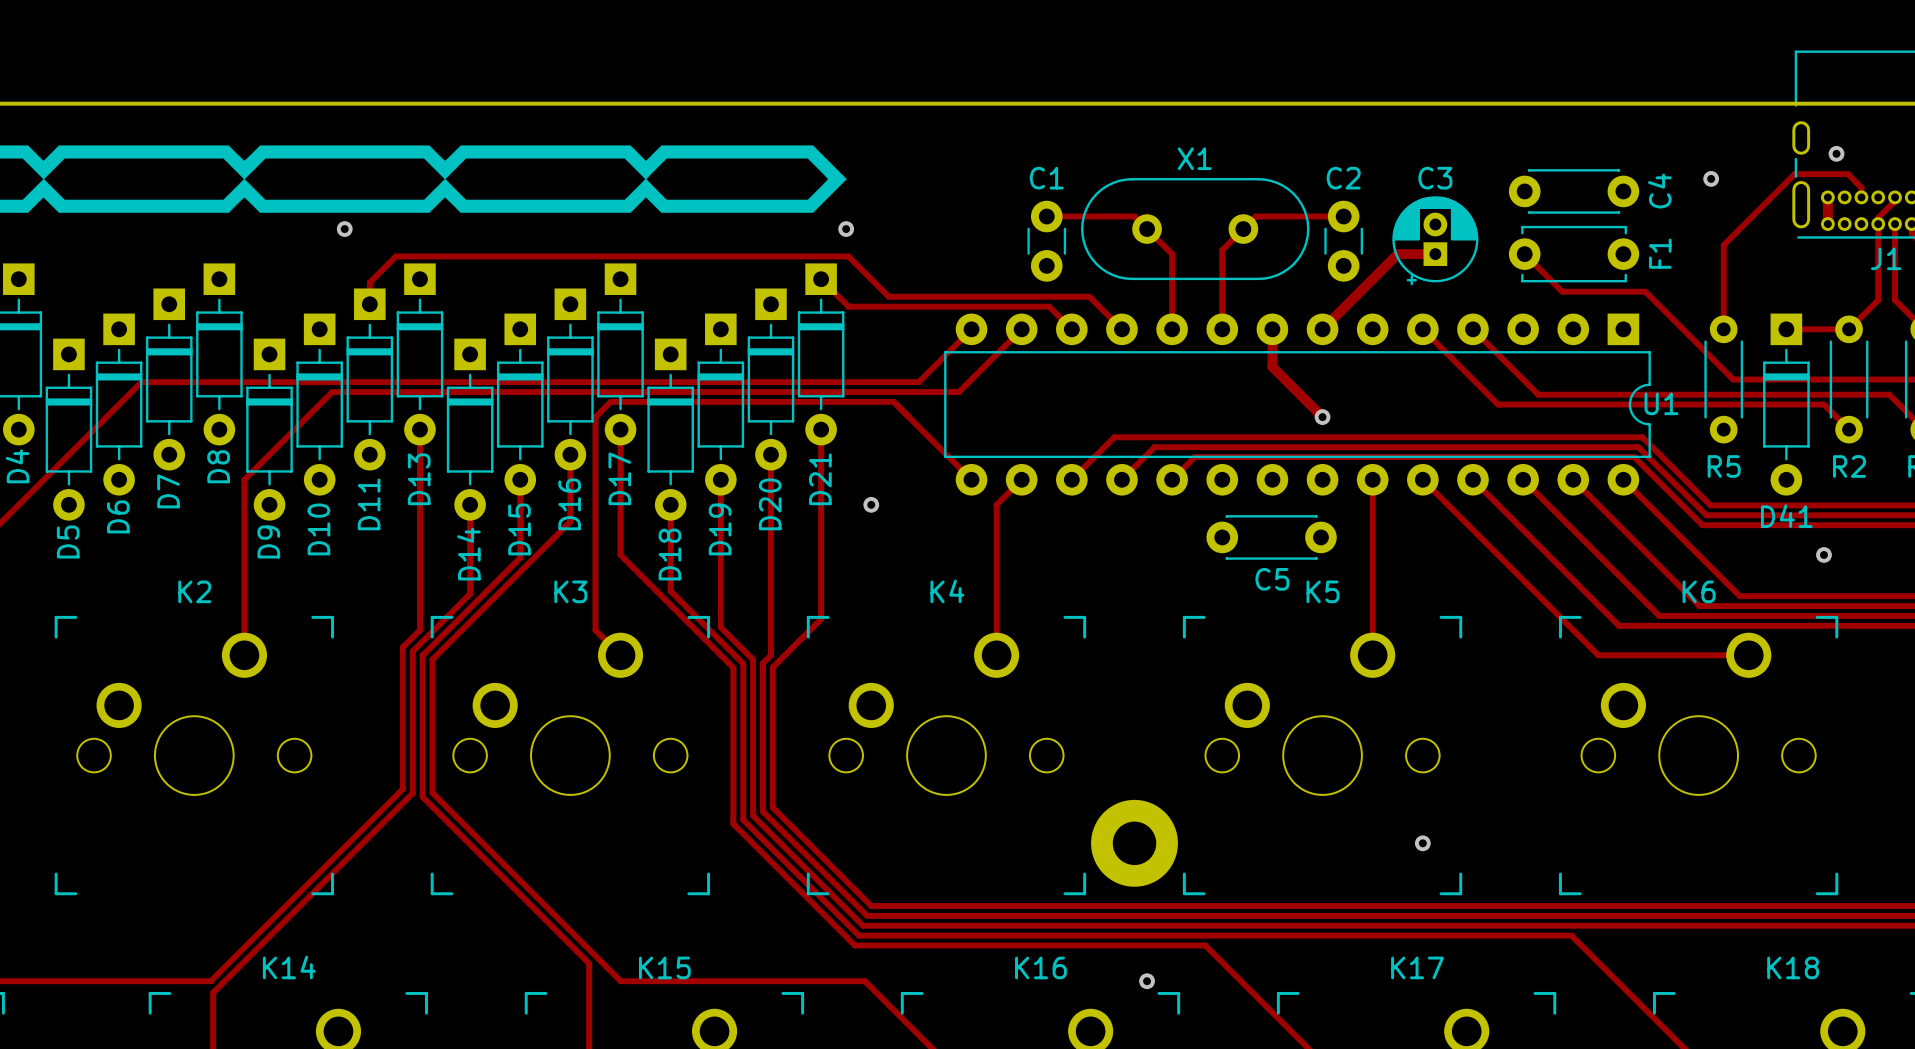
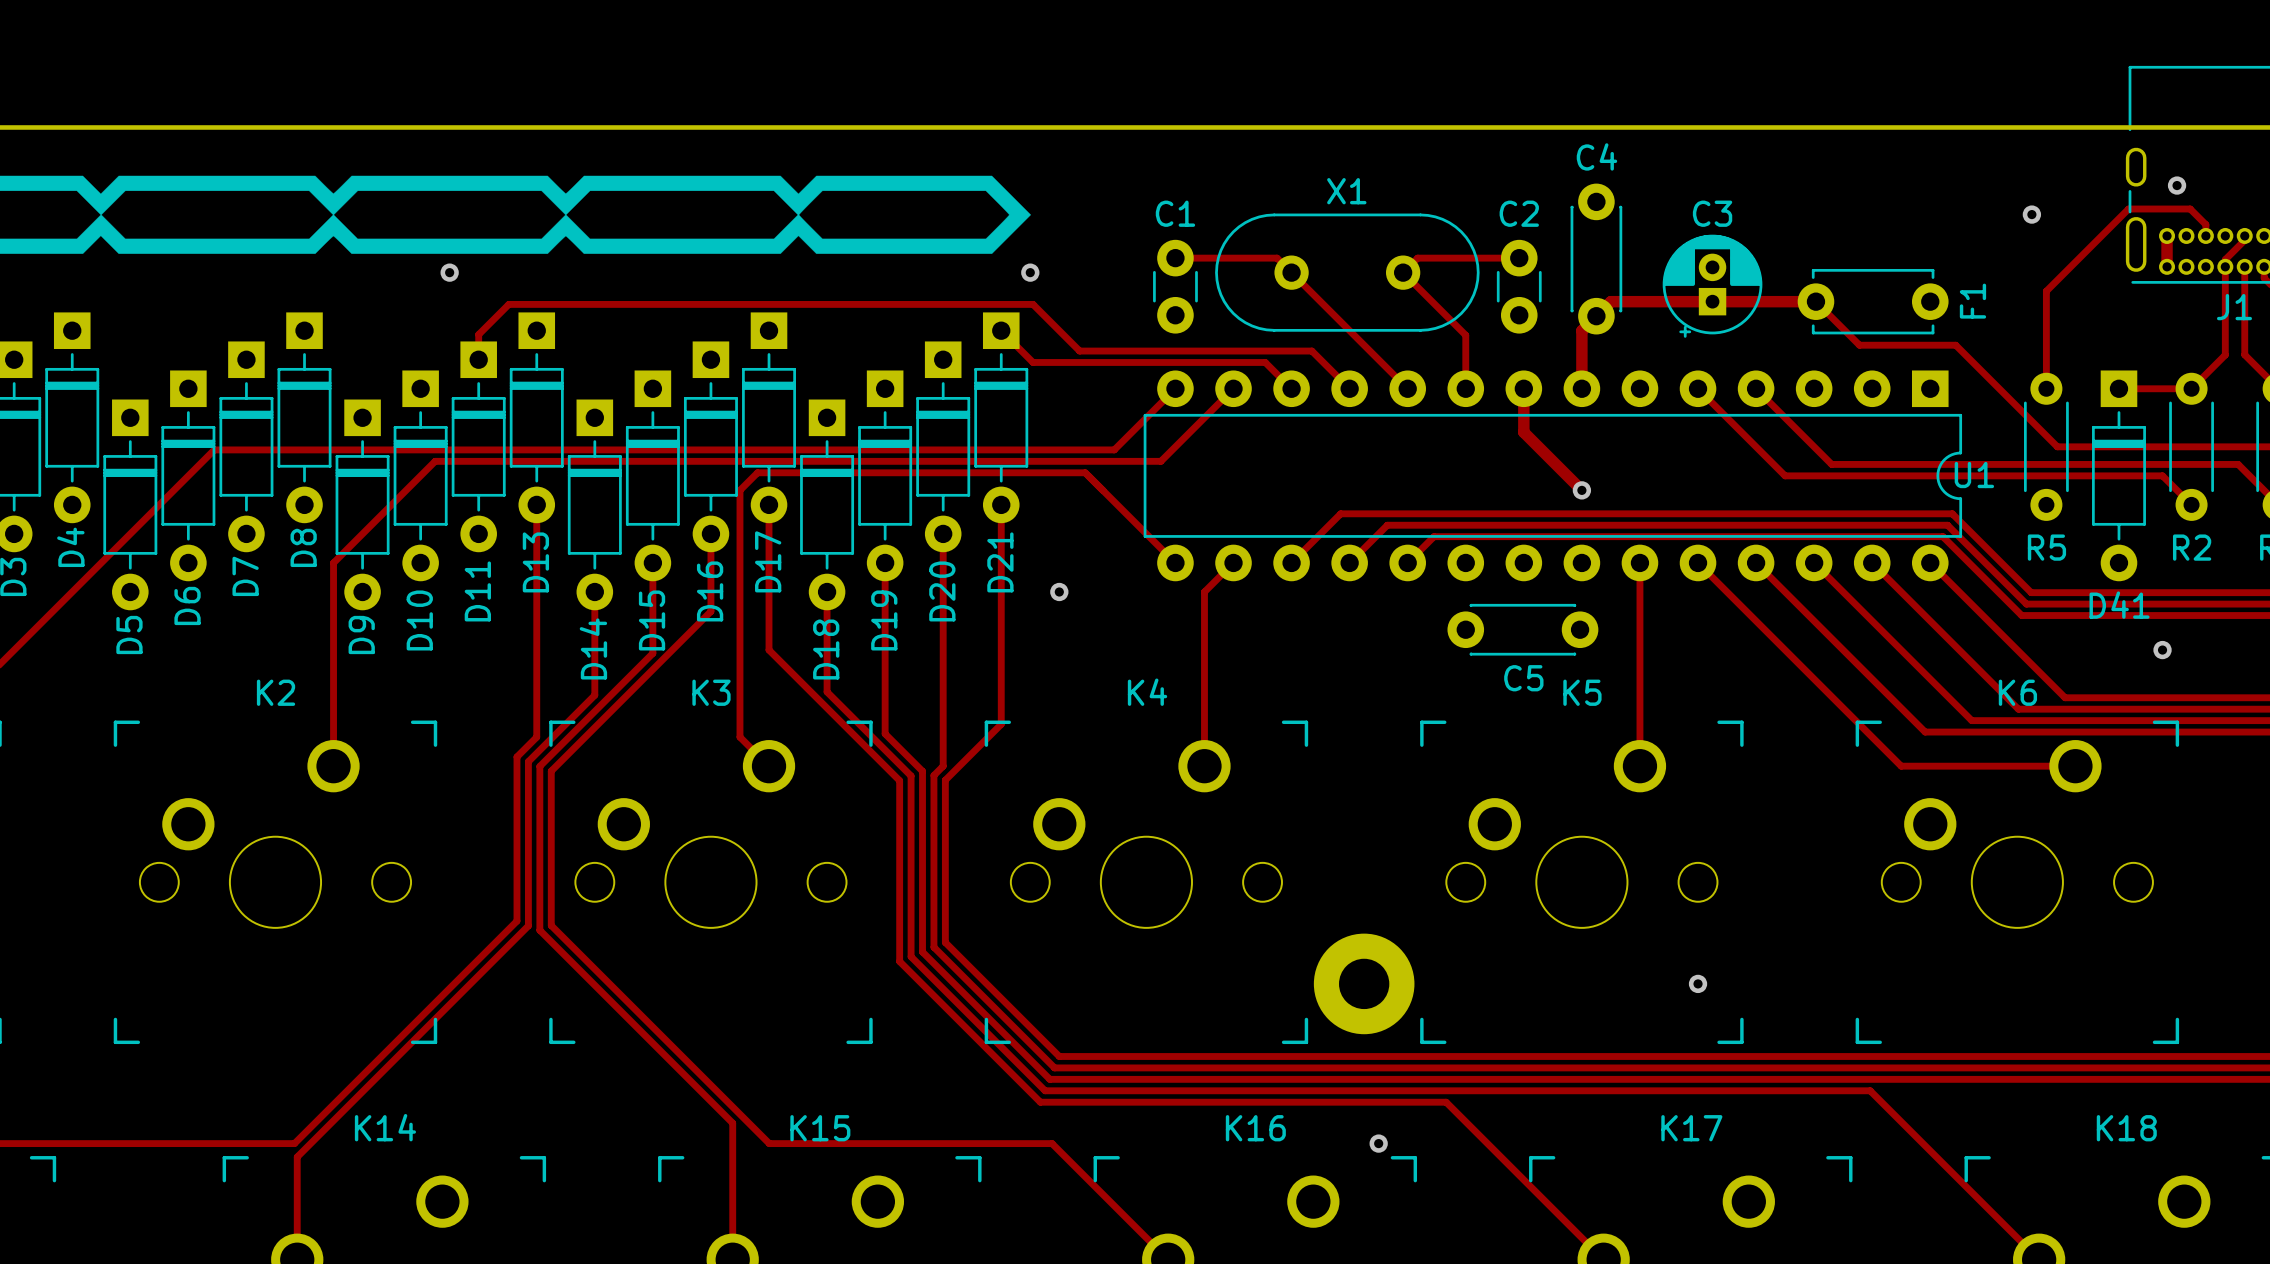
C4 name position: C4 (1659, 190) -> C4 (1596, 156)
C4 rotation: 0° (1574, 191) -> 90° clockwise (1596, 259)
C4 position: (1574, 191) -> (1596, 259)
track: (1059, 216) (1134, 216) (1172, 254) (1172, 329) -> (1277, 258) (1407, 388)
track: (1255, 216) (1222, 250) (1222, 283) -> (1504, 258) (1417, 258) (1403, 272) (1465, 335)
track: (1268, 216) (1343, 216) -> (1175, 258) (1262, 258)
X1 position: (1195, 229) -> (1347, 272)
C1 position: (1046, 241) -> (1175, 286)
C2 position: (1343, 241) -> (1519, 286)
track: (1397, 254) (1322, 329) -> (1668, 301) (1610, 301) (1581, 330) (1581, 388)
track: none -> (1712, 301) (1815, 301)

